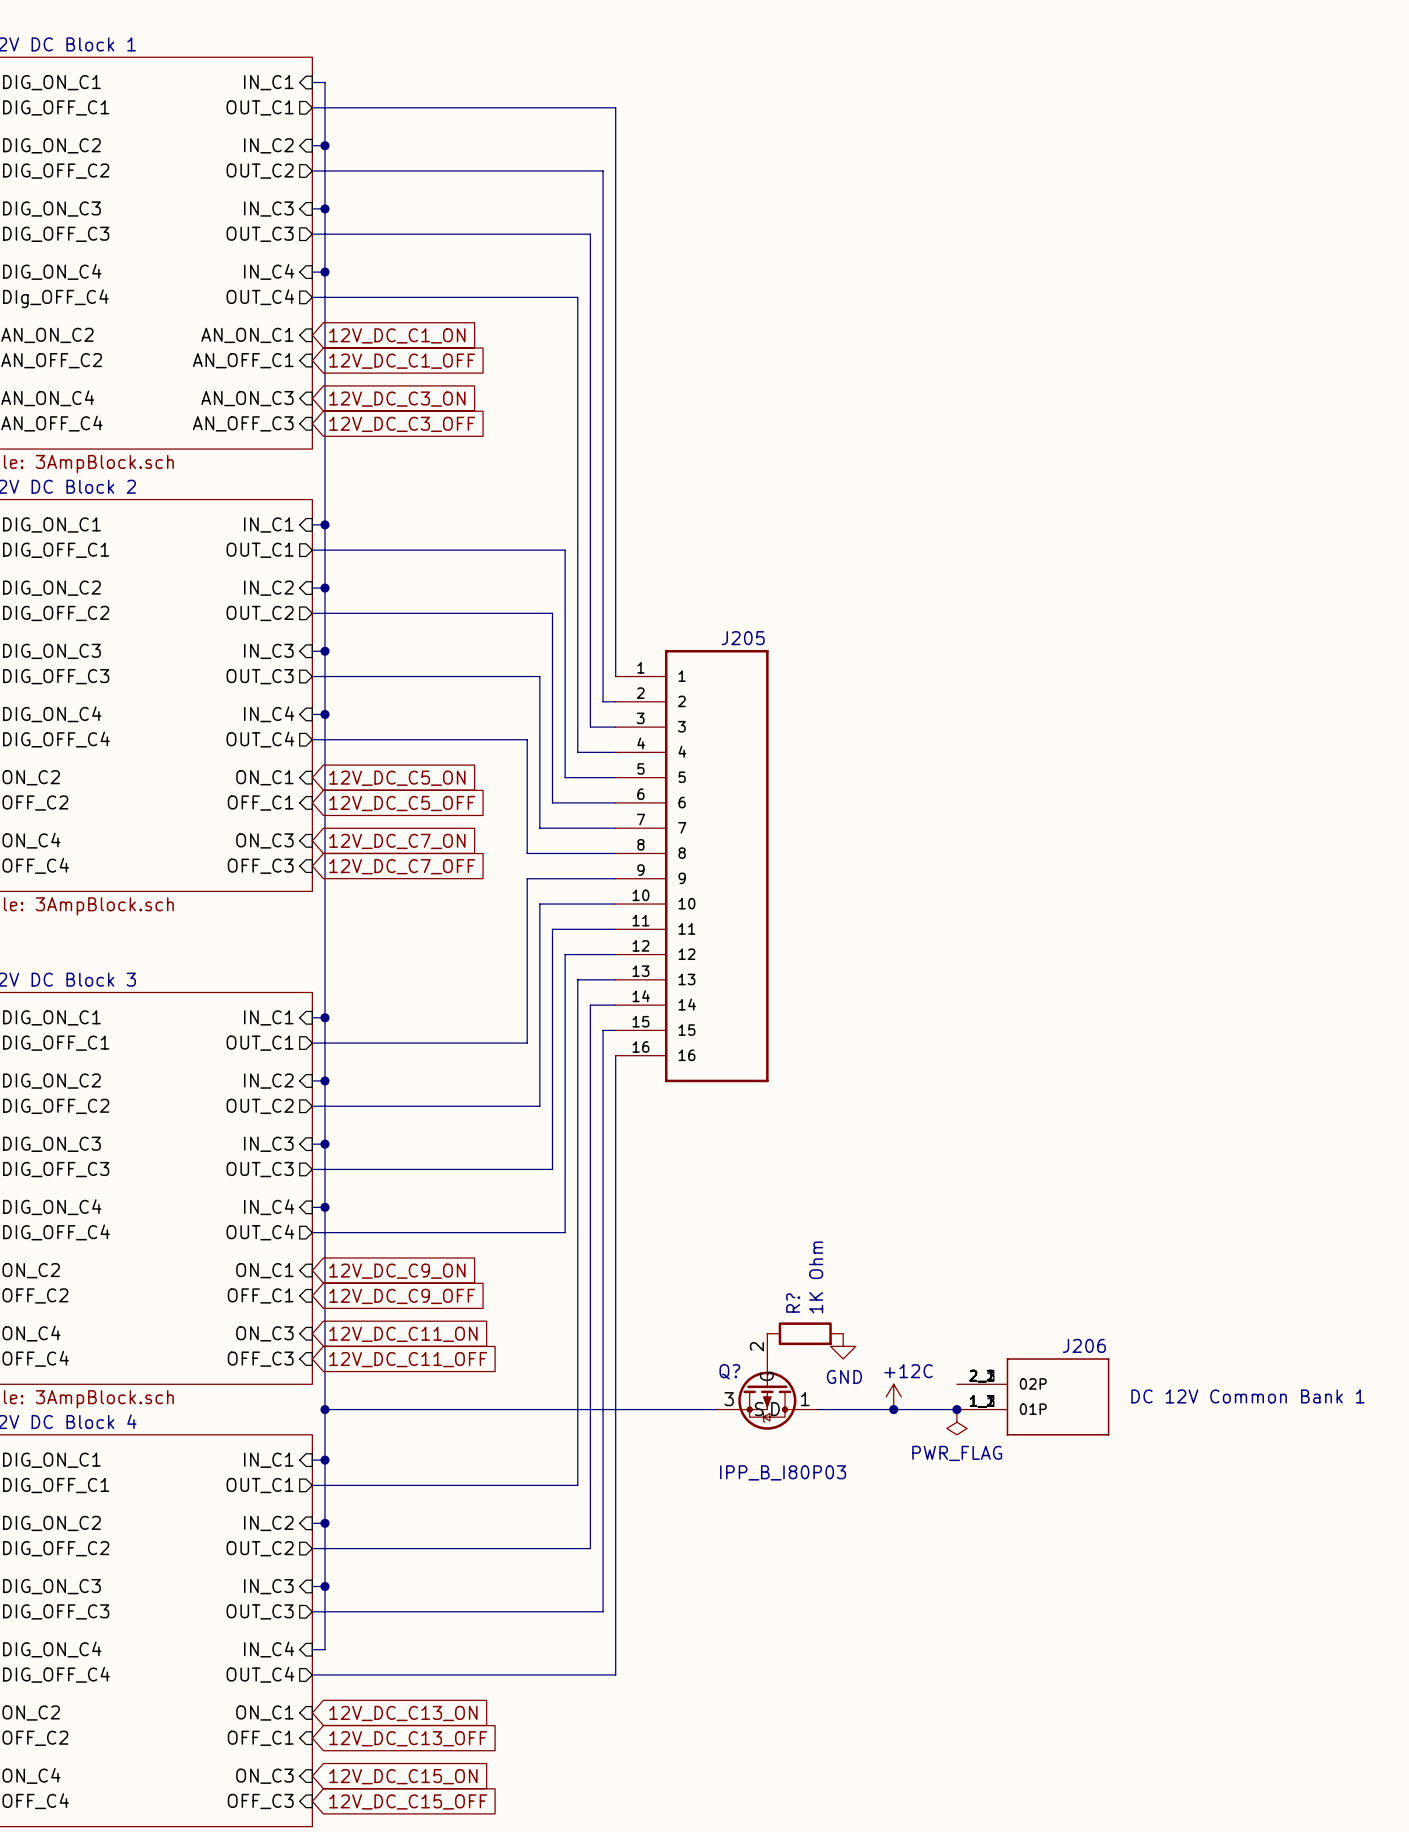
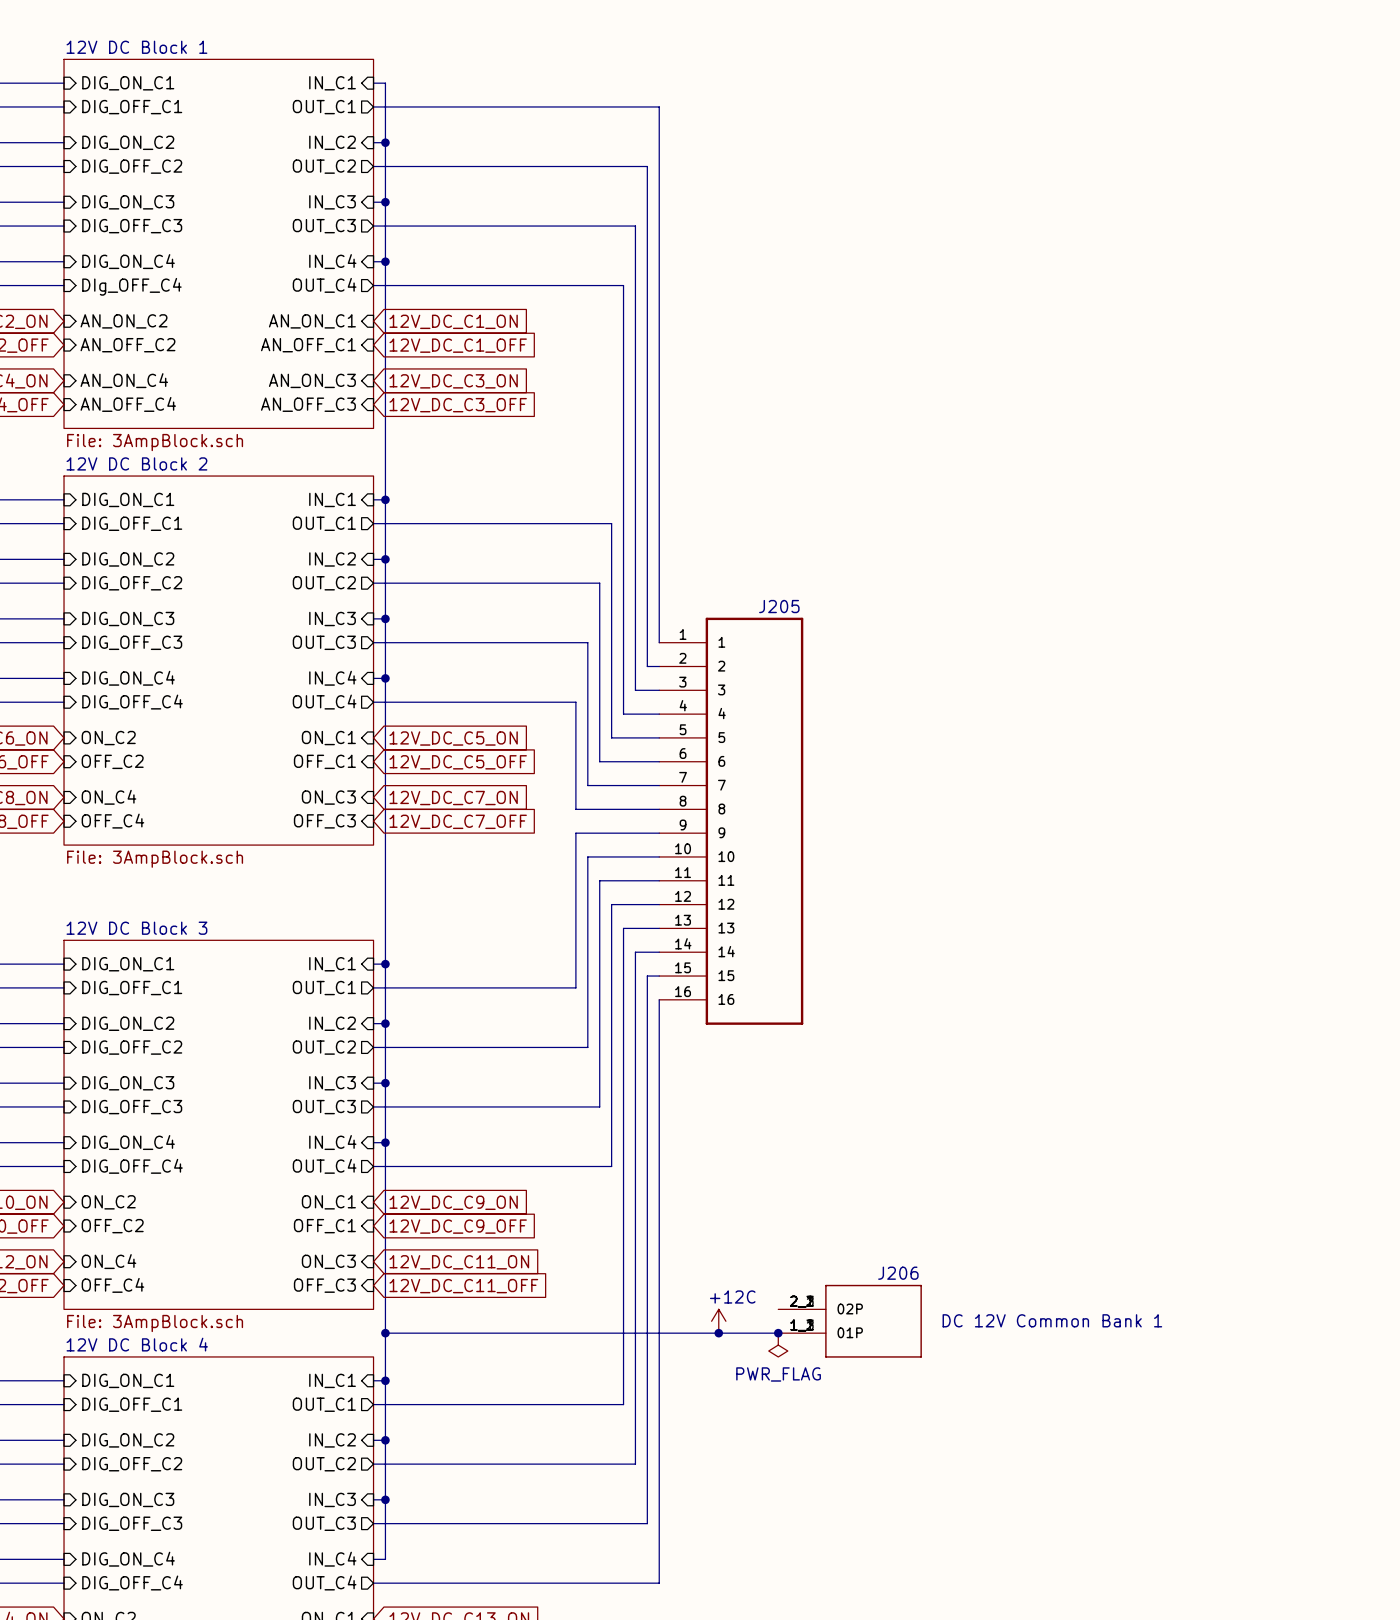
R?: 1K Ohm (805, 1333) -> none
power symbol: GND (843, 1346) -> none
Q?: IPP_B_I80P03 (767, 1381) -> none
power symbol position: +12C (893, 1396) -> +12C (718, 1321)
J206 position: (1033, 1396) -> (850, 1321)
junction: none -> (718, 1333)
junction: none -> (778, 1333)
wire: (817, 1409) (956, 1409) -> none
junction: (893, 1409) -> none
junction: (956, 1409) -> none
power symbol position: PWR_FLAG (956, 1422) -> PWR_FLAG (778, 1345)

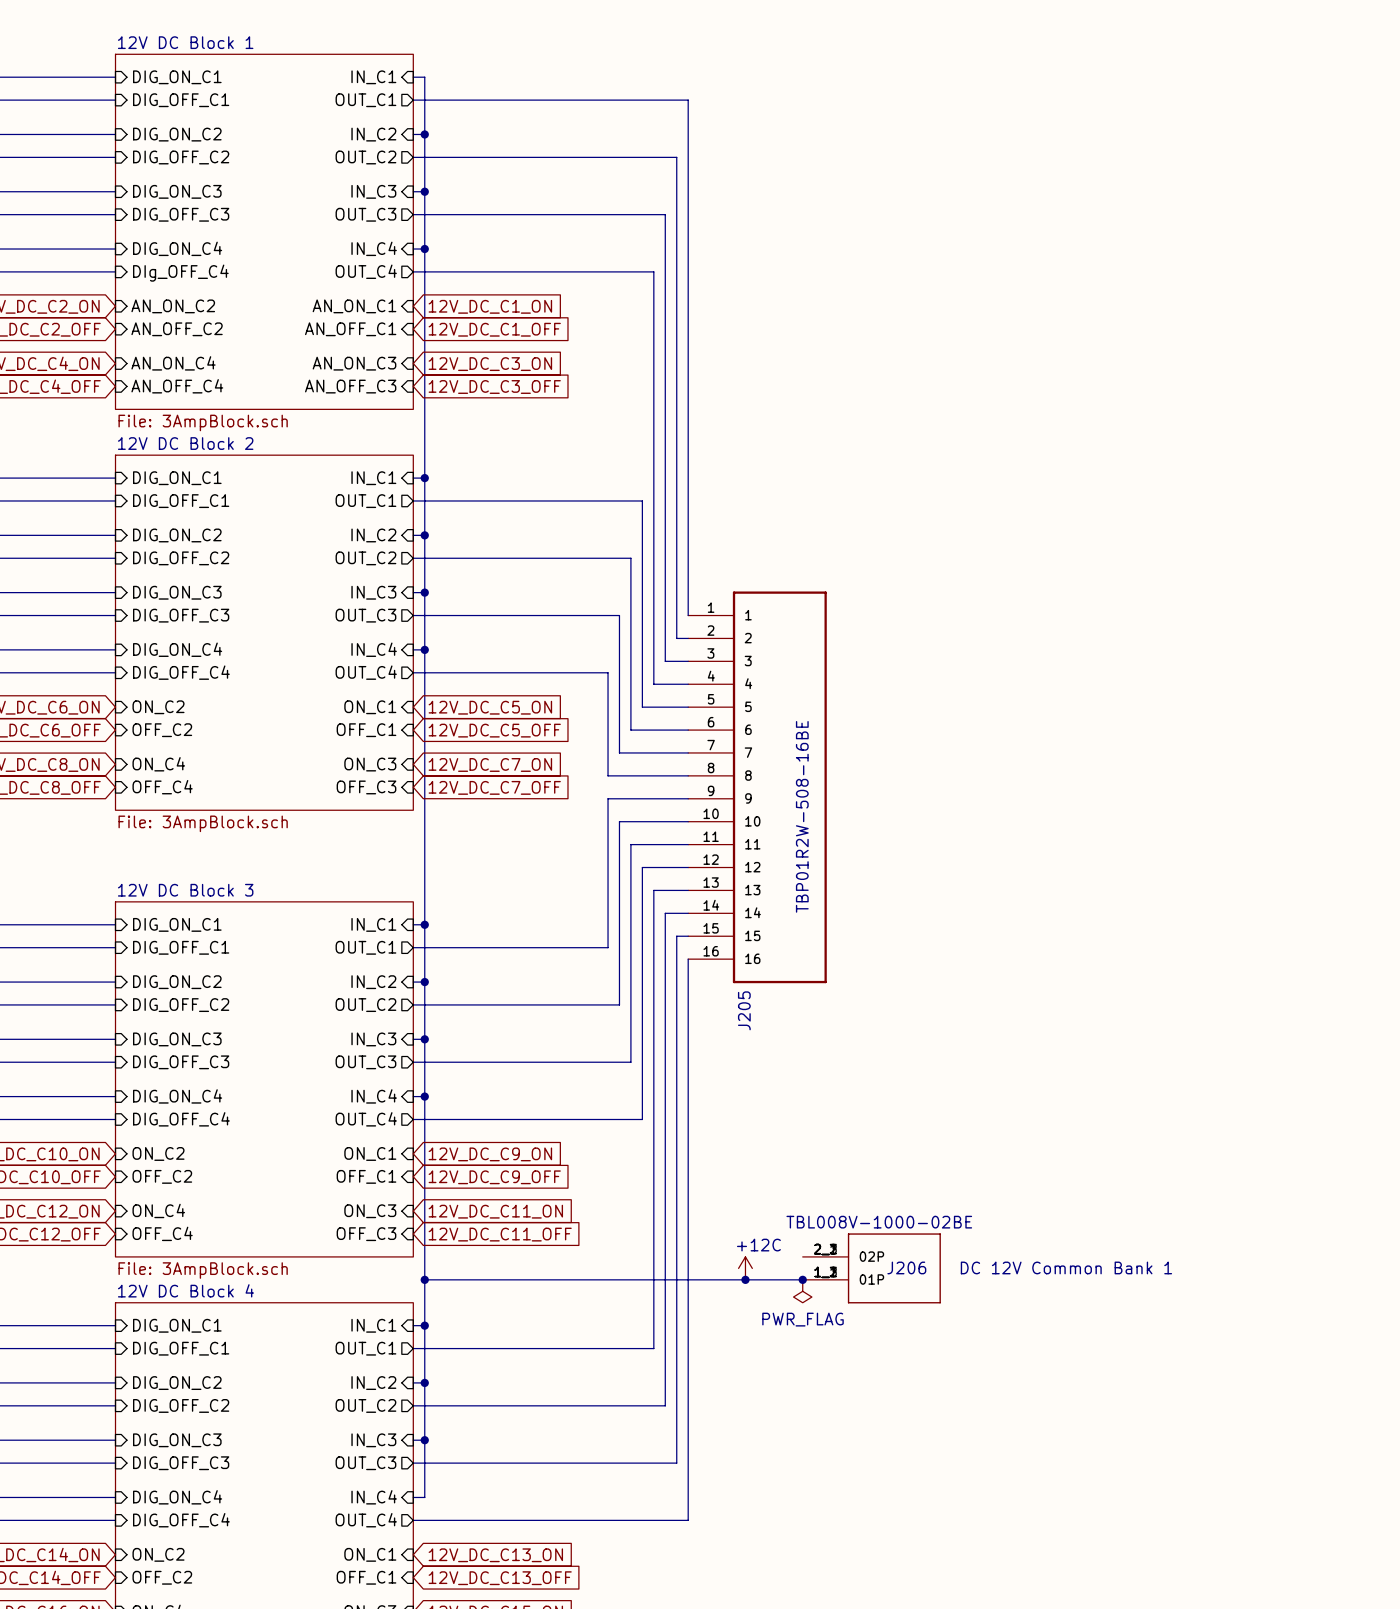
J205 name rotation: 0° (779, 606) -> 90° counterclockwise (744, 1010)
J205 name position: J205 (779, 606) -> J205 (744, 1010)
J205 value: none -> TBP01R2W-508-16BE (802, 816)
J206 value: none -> TBL008V-1000-02BE (879, 1222)
J206 name position: J206 (898, 1273) -> J206 (906, 1267)

